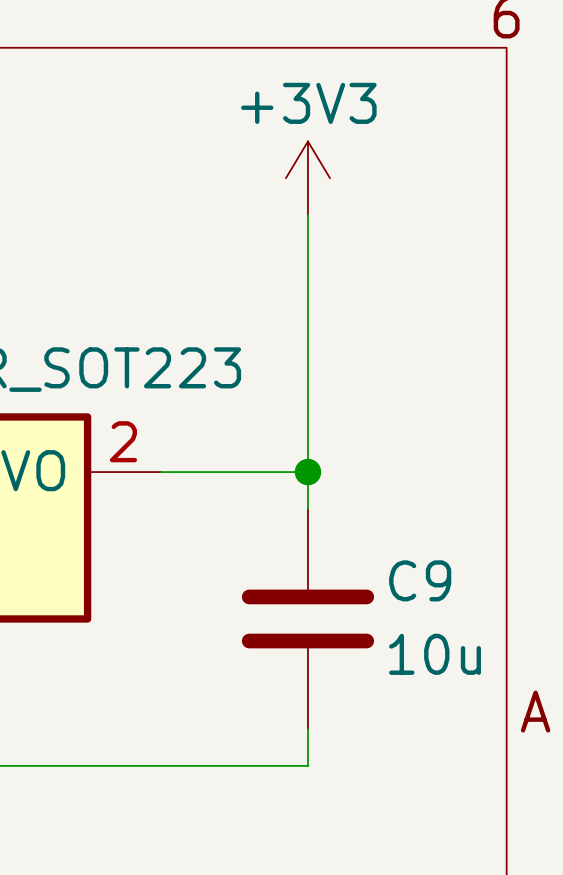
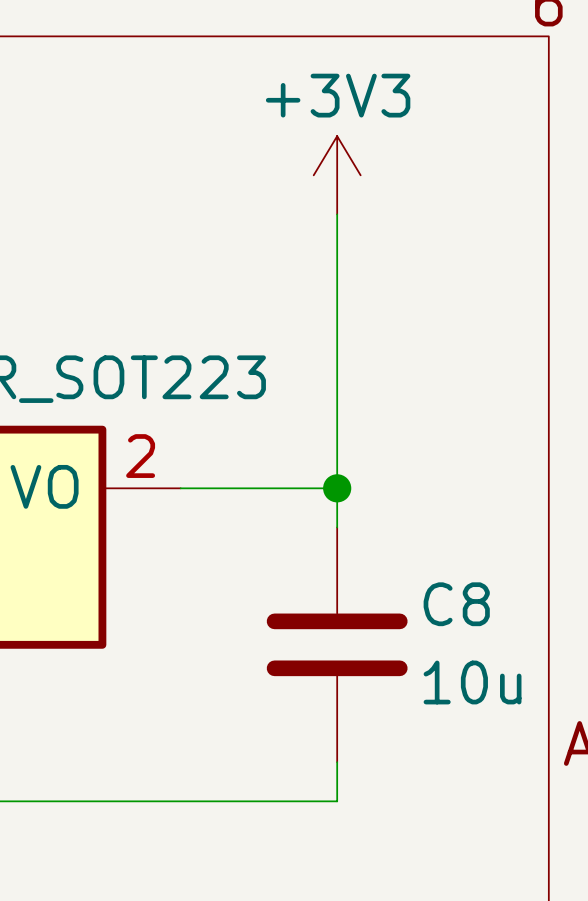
C9 name: C9 (420, 580) -> C8 (456, 604)

